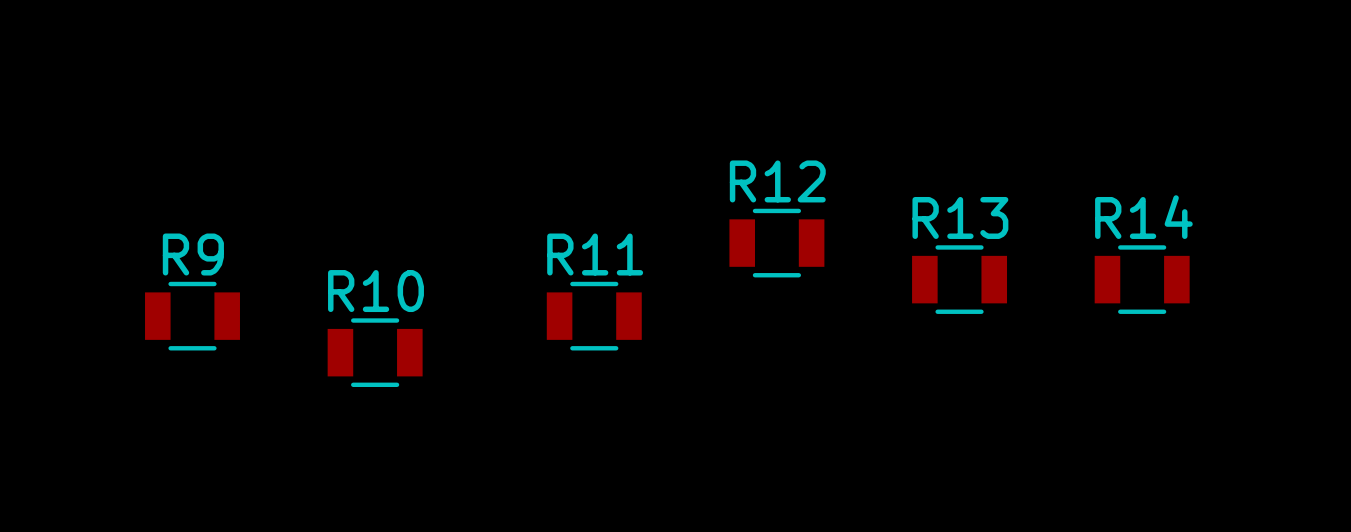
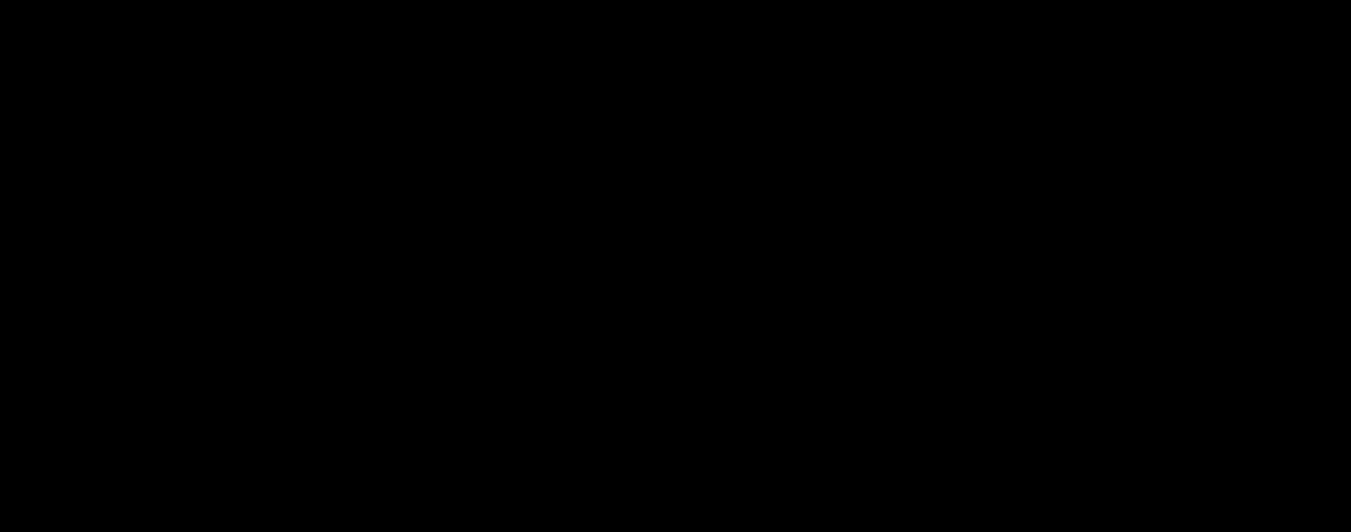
R12: (776, 243) -> none
R13: (959, 279) -> none
R14: (1142, 279) -> none
R9: (192, 316) -> none
R11: (594, 316) -> none
R10: (375, 352) -> none

